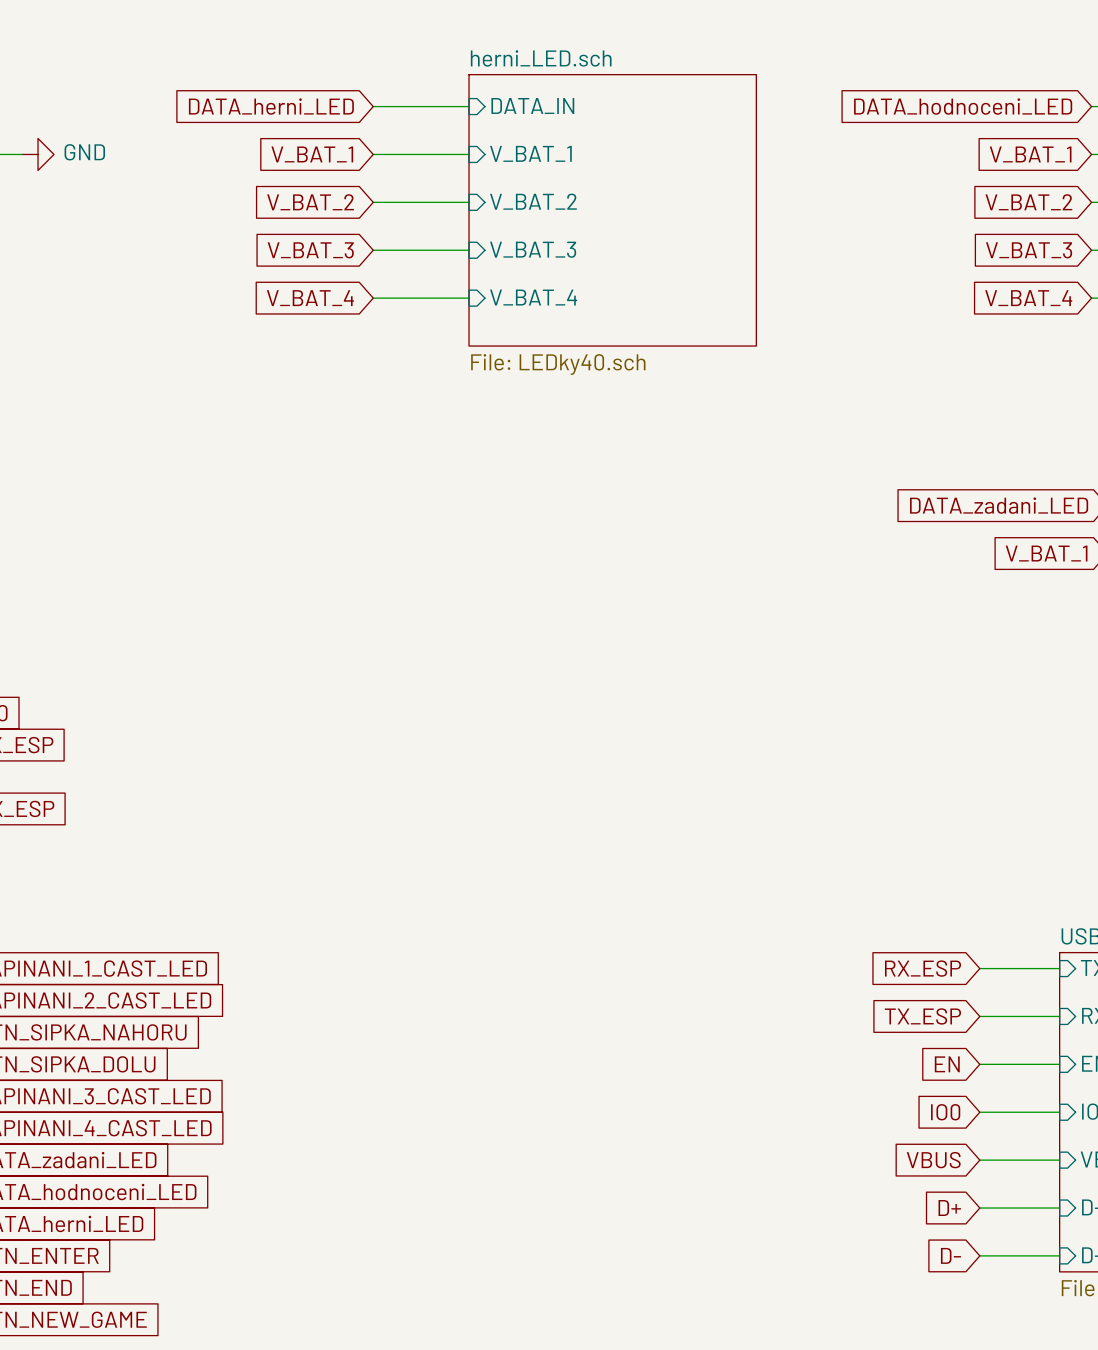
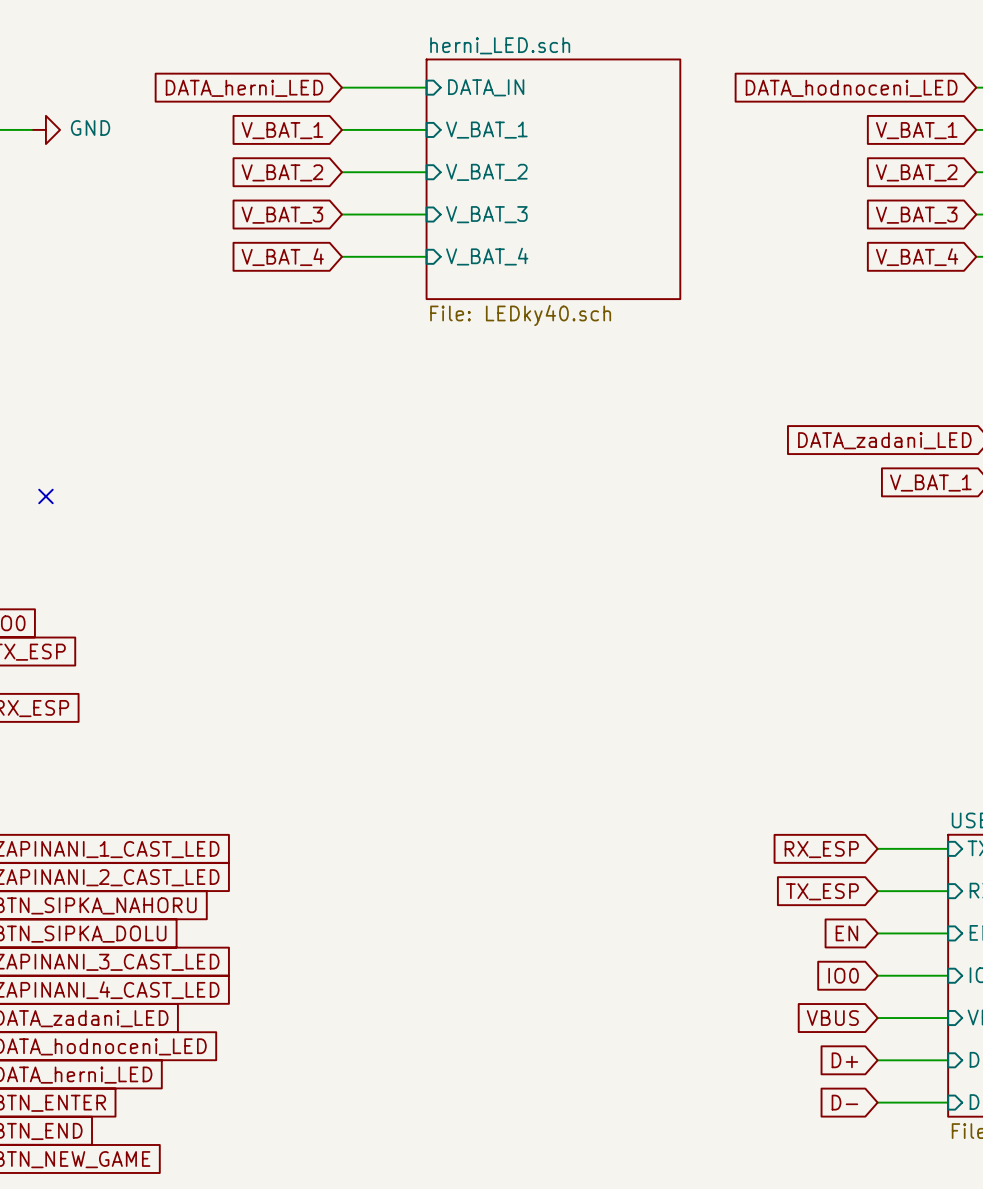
no-connect mark: none -> (45, 496)

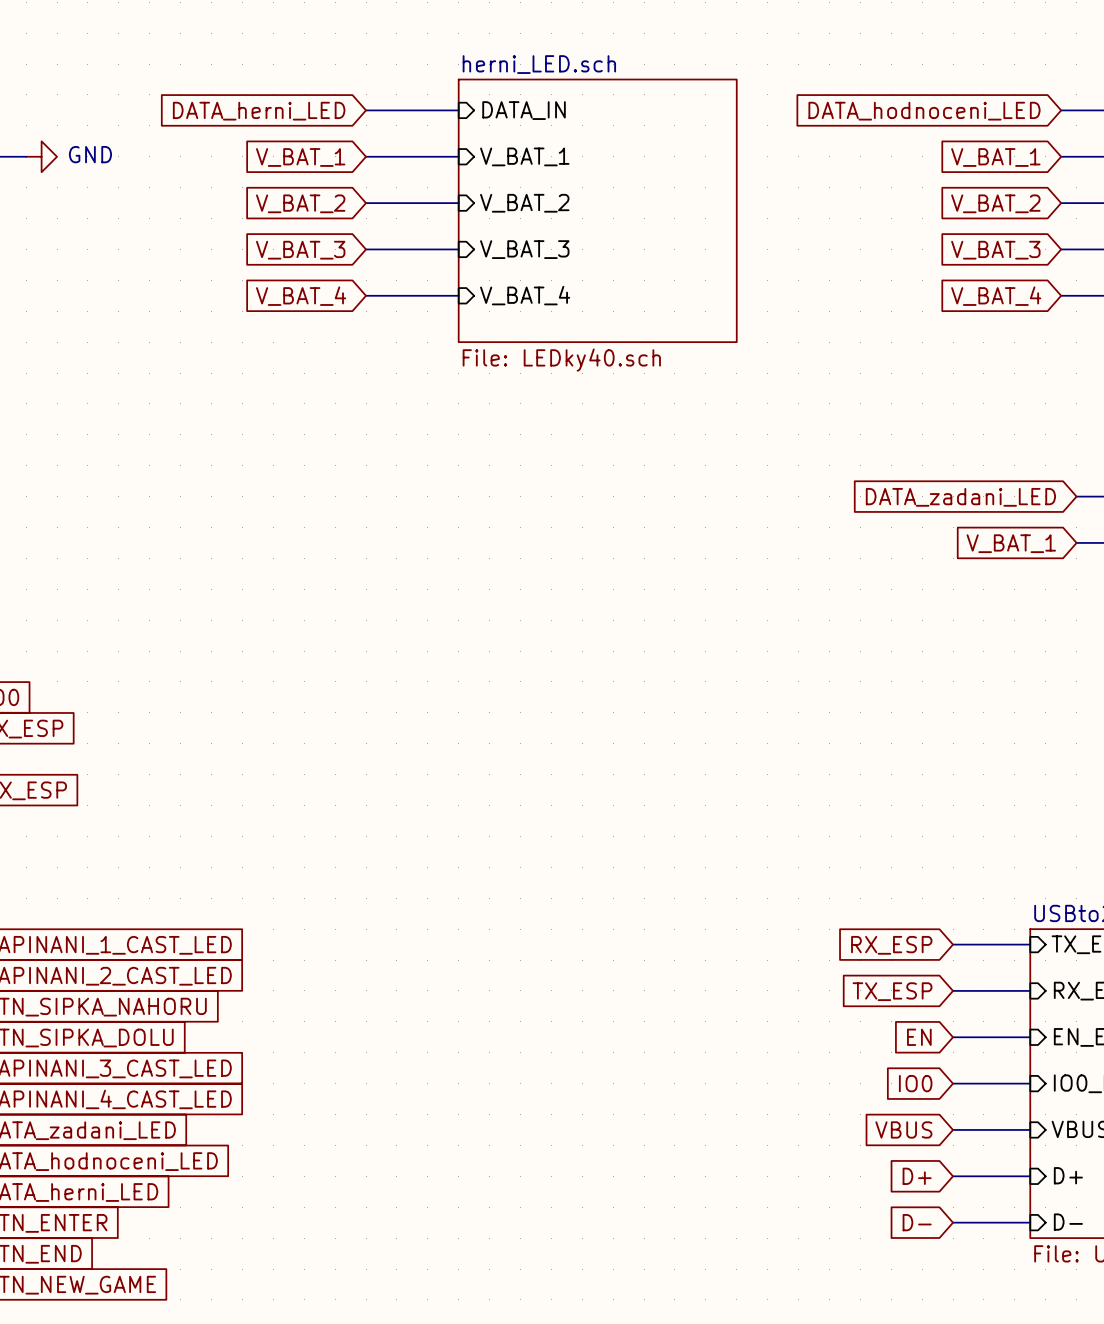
no-connect mark: (45, 496) -> none

